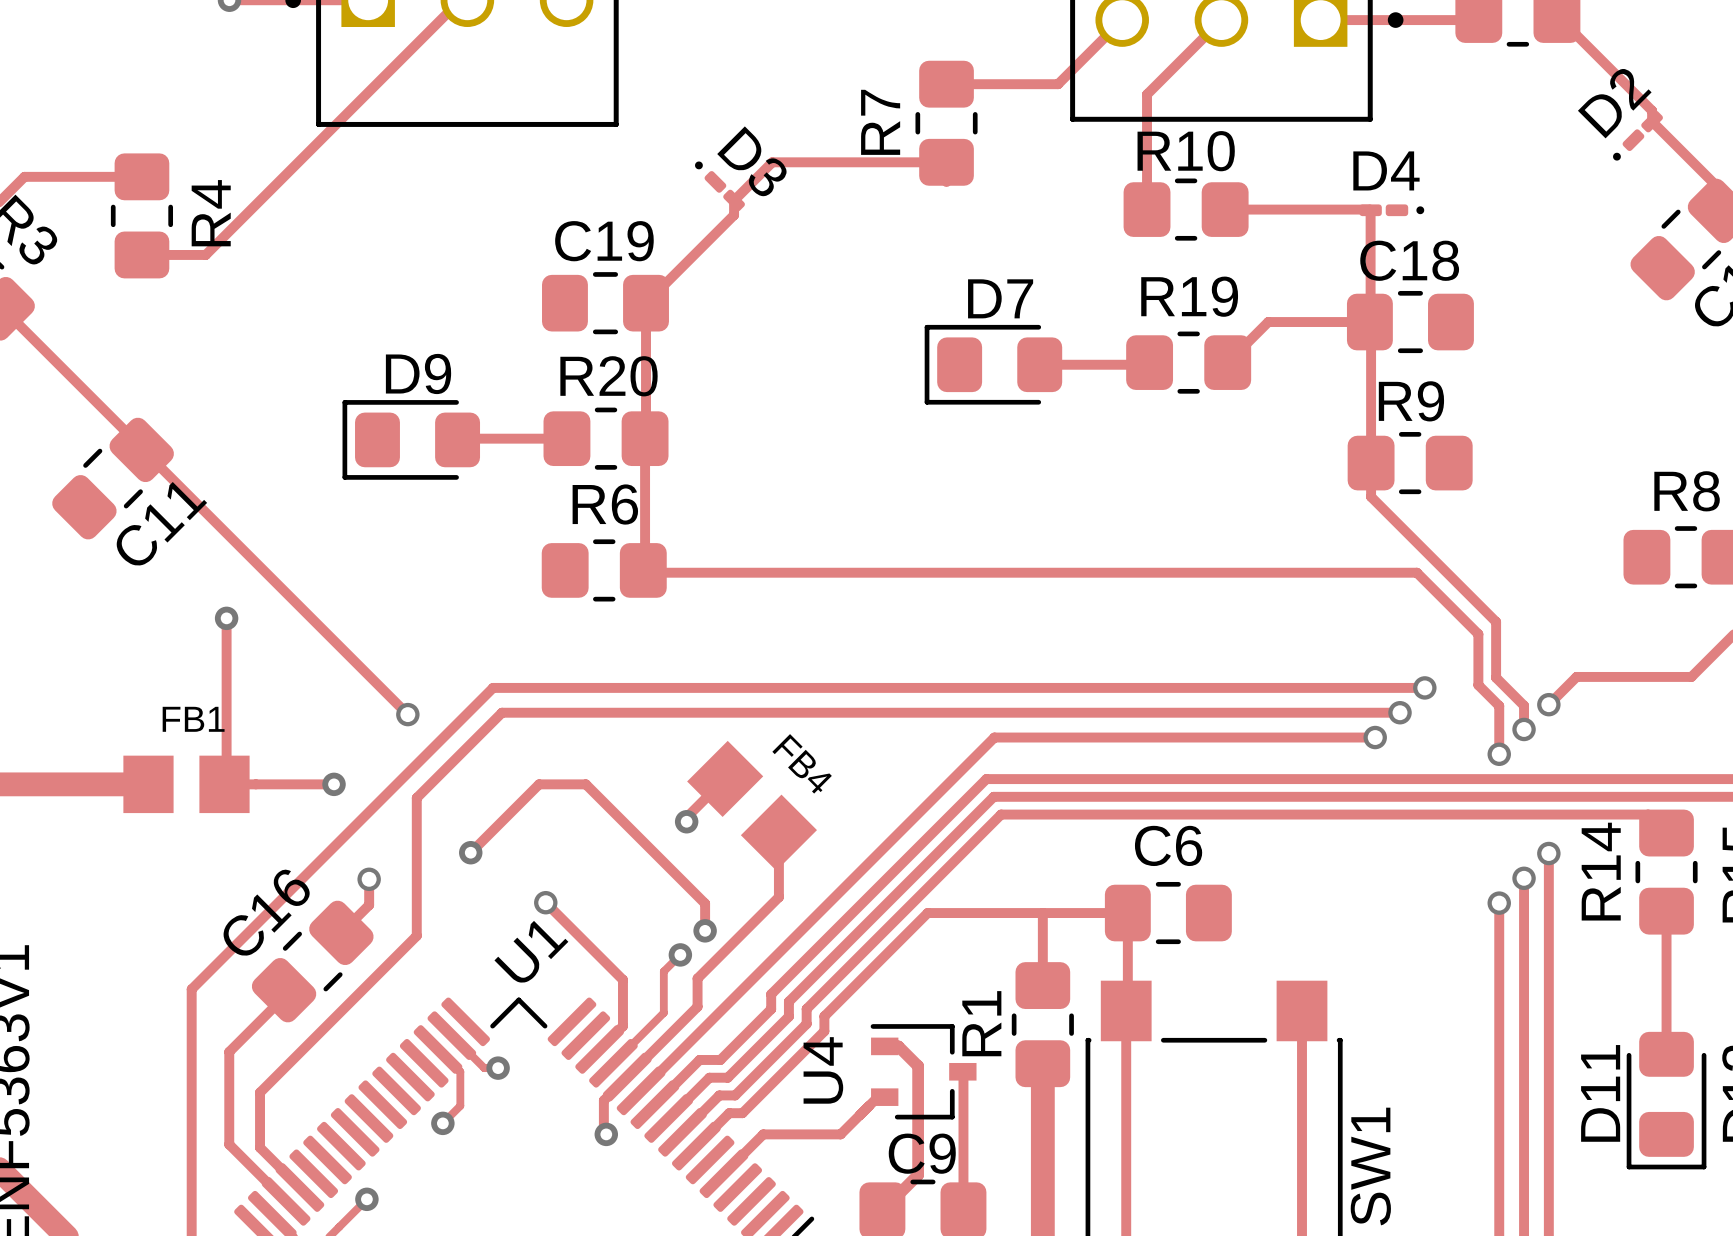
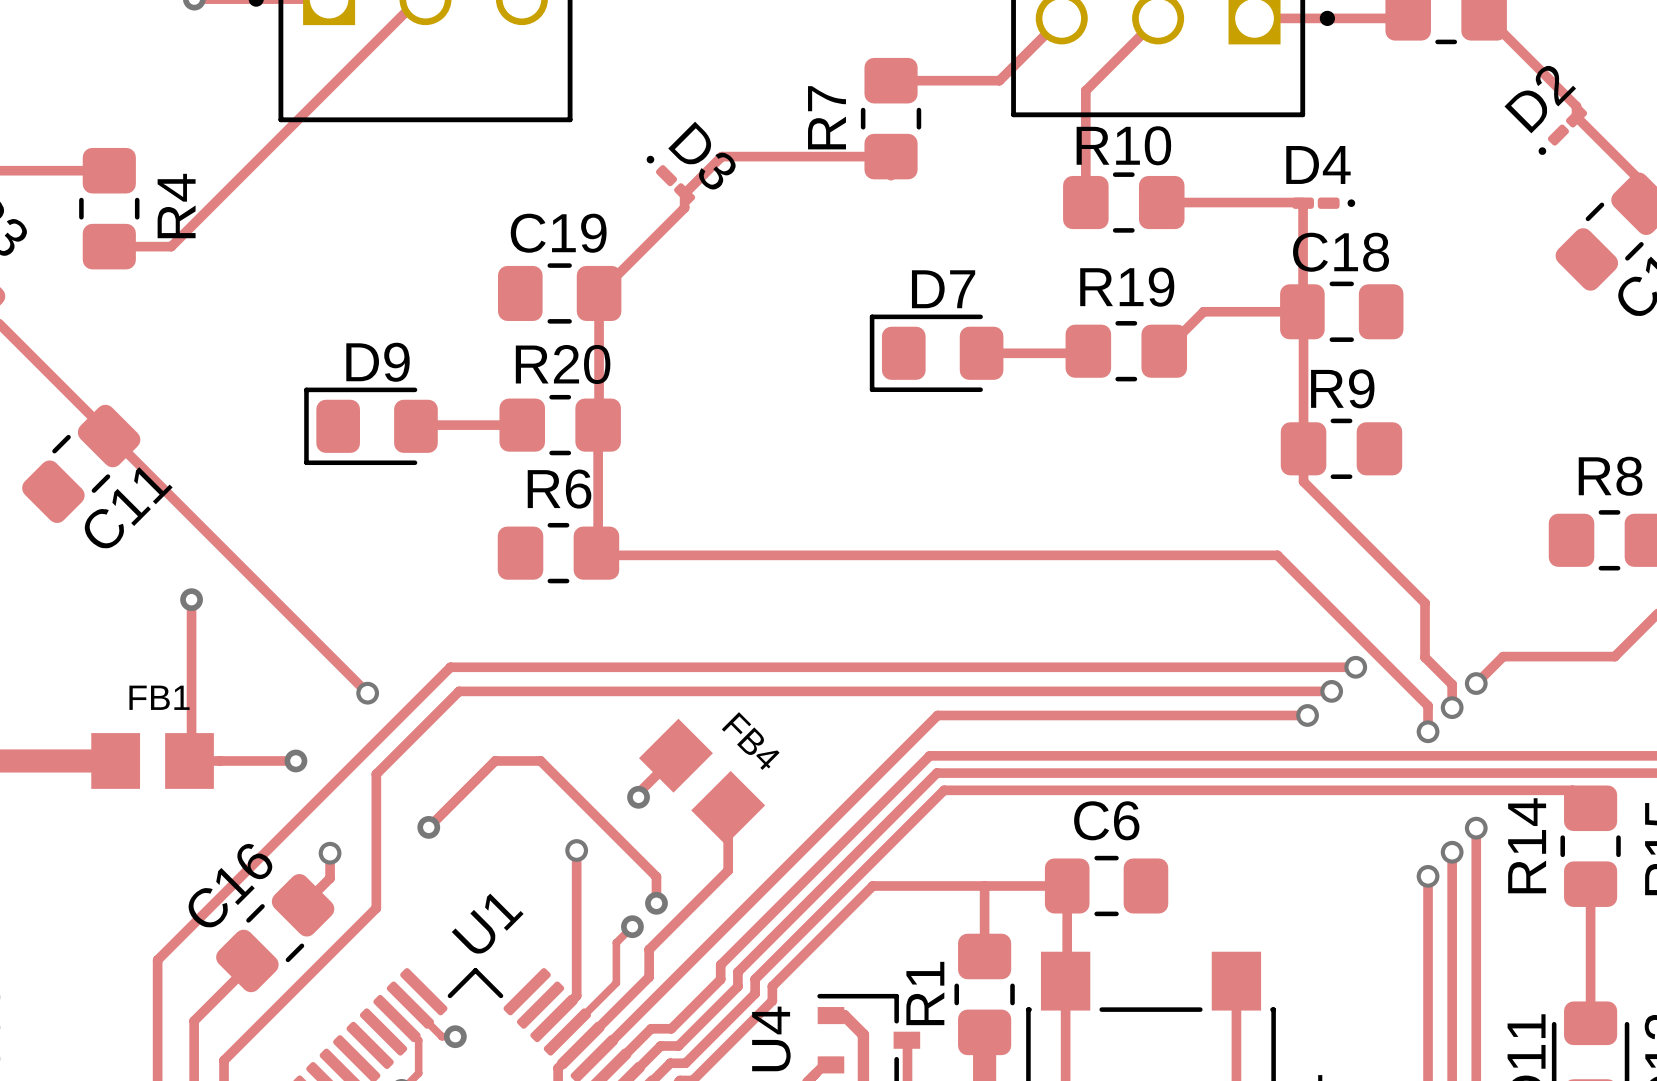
track: (1344, 572) (1416, 572) (1478, 634) (1478, 685) (1499, 705) (1499, 727) -> (1277, 555) (1428, 705)
track: (545, 902) (622, 979) -> (576, 850) (576, 950)
via position: (545, 902) -> (576, 850)

